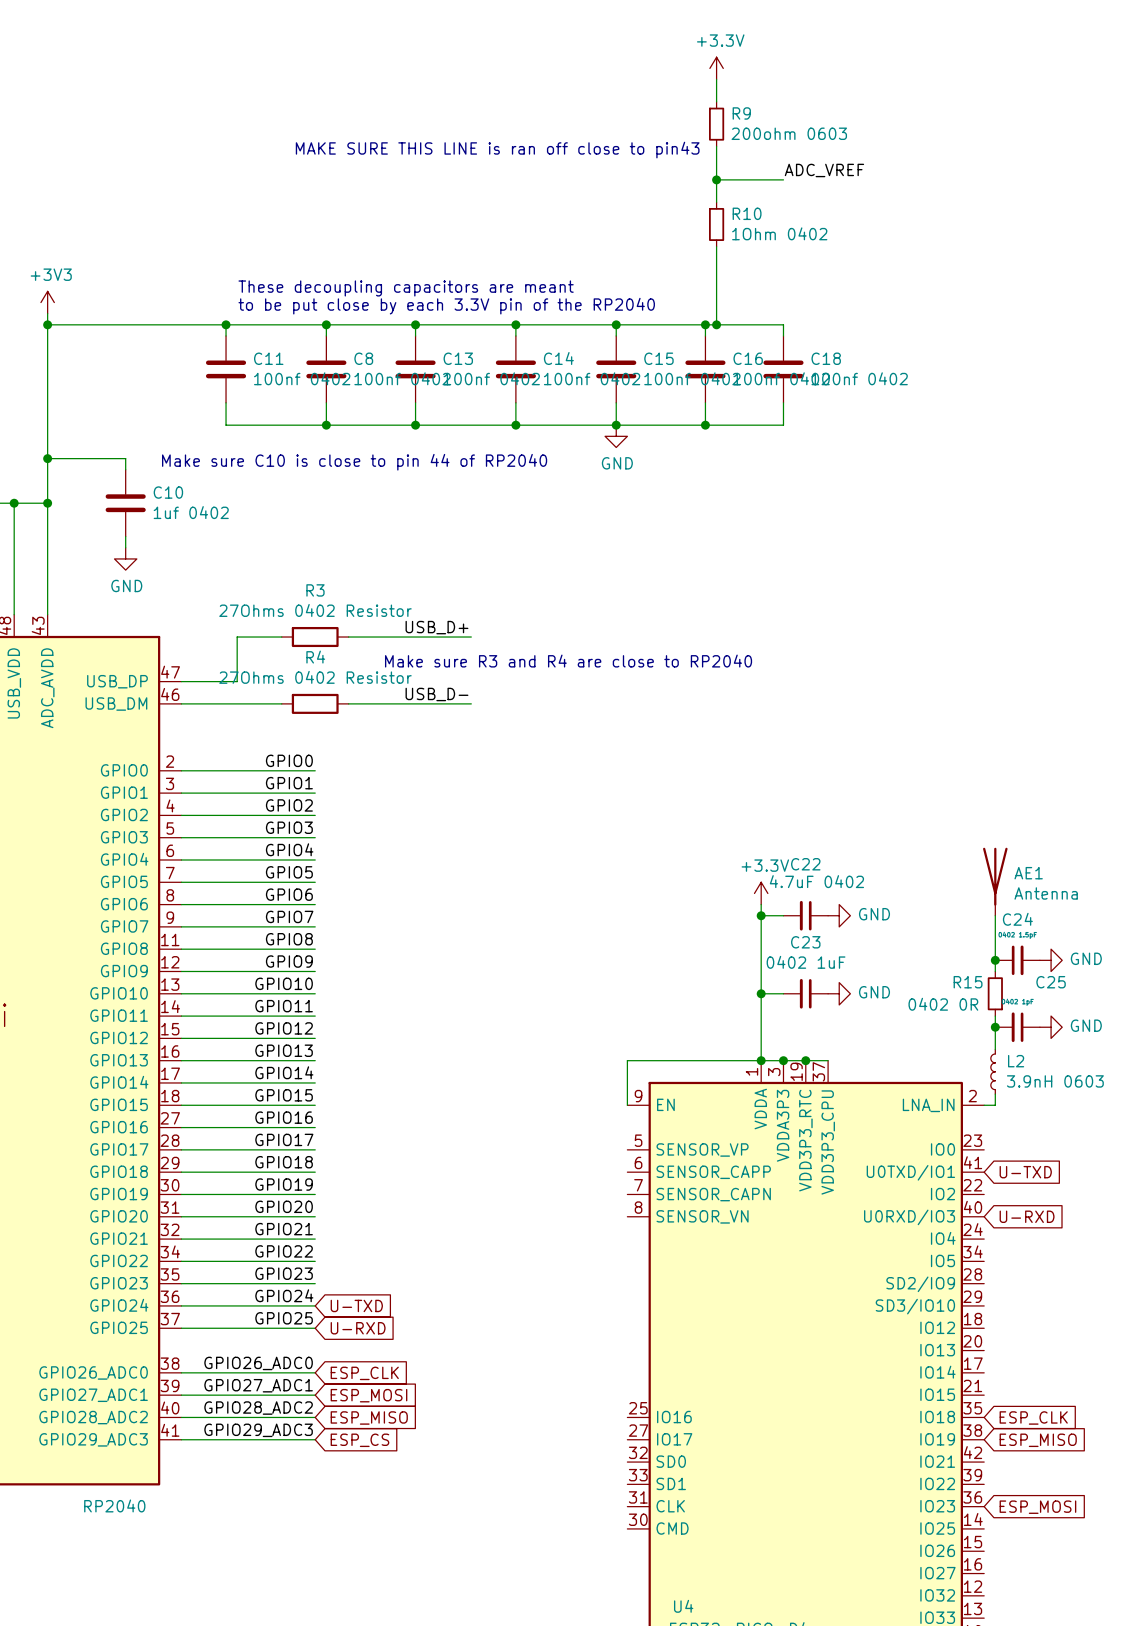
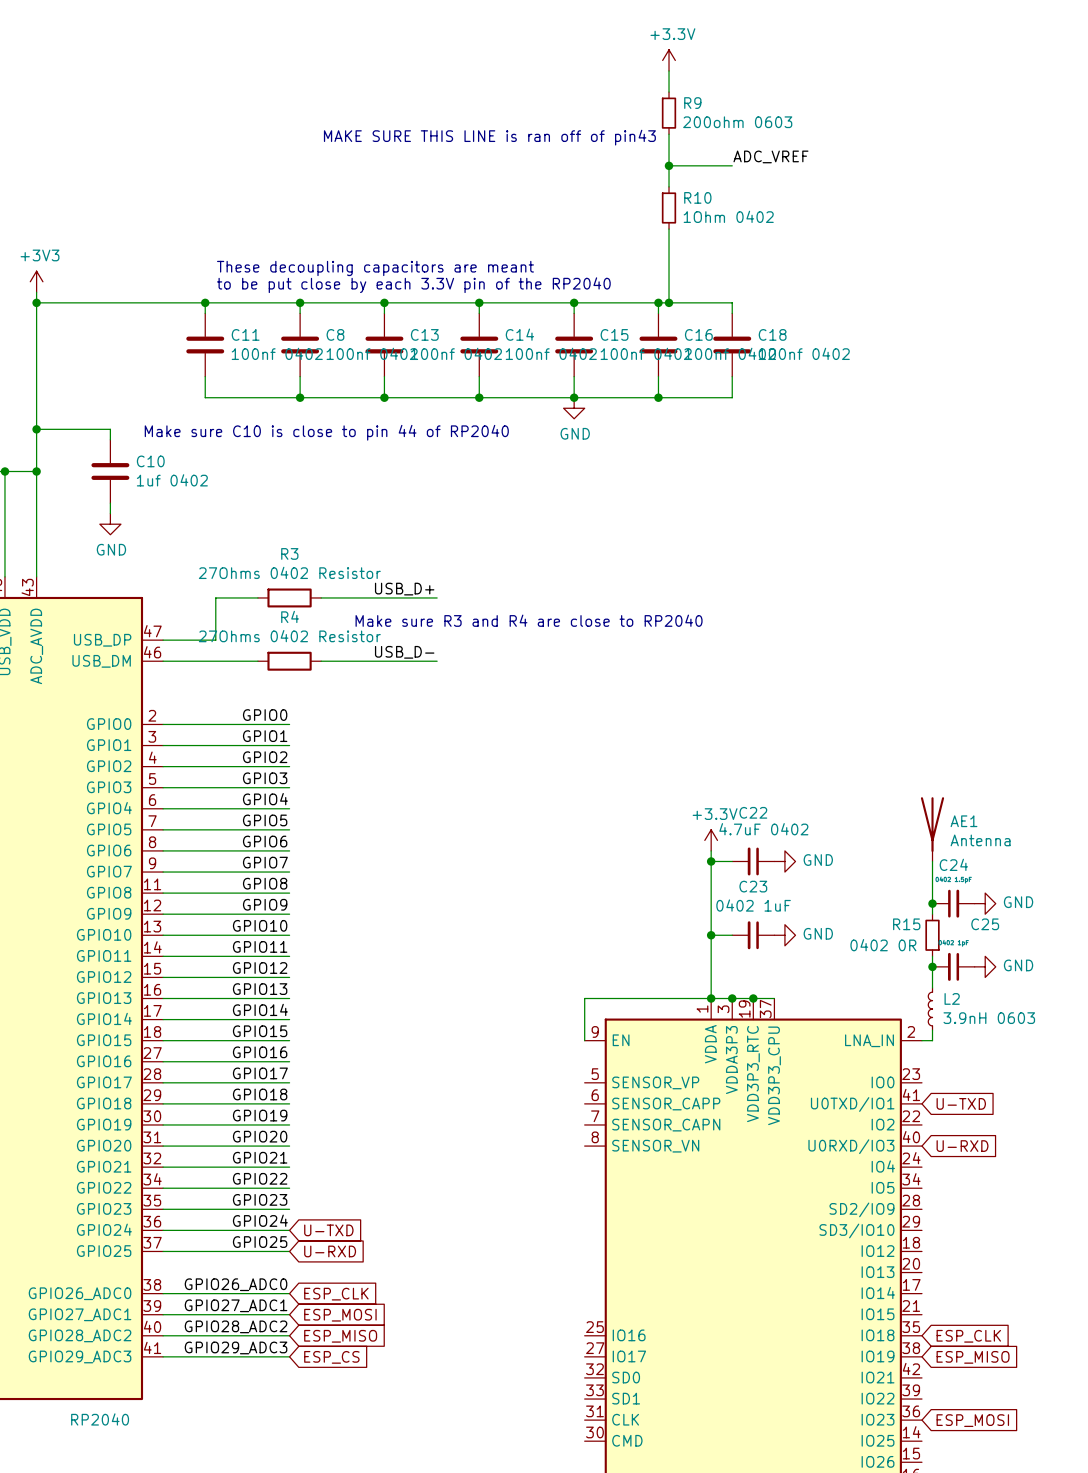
text: MAKE SURE THIS LINE is ran off close to pin43 (497, 150) -> MAKE SURE THIS LINE is ran off of pin43 (489, 137)

